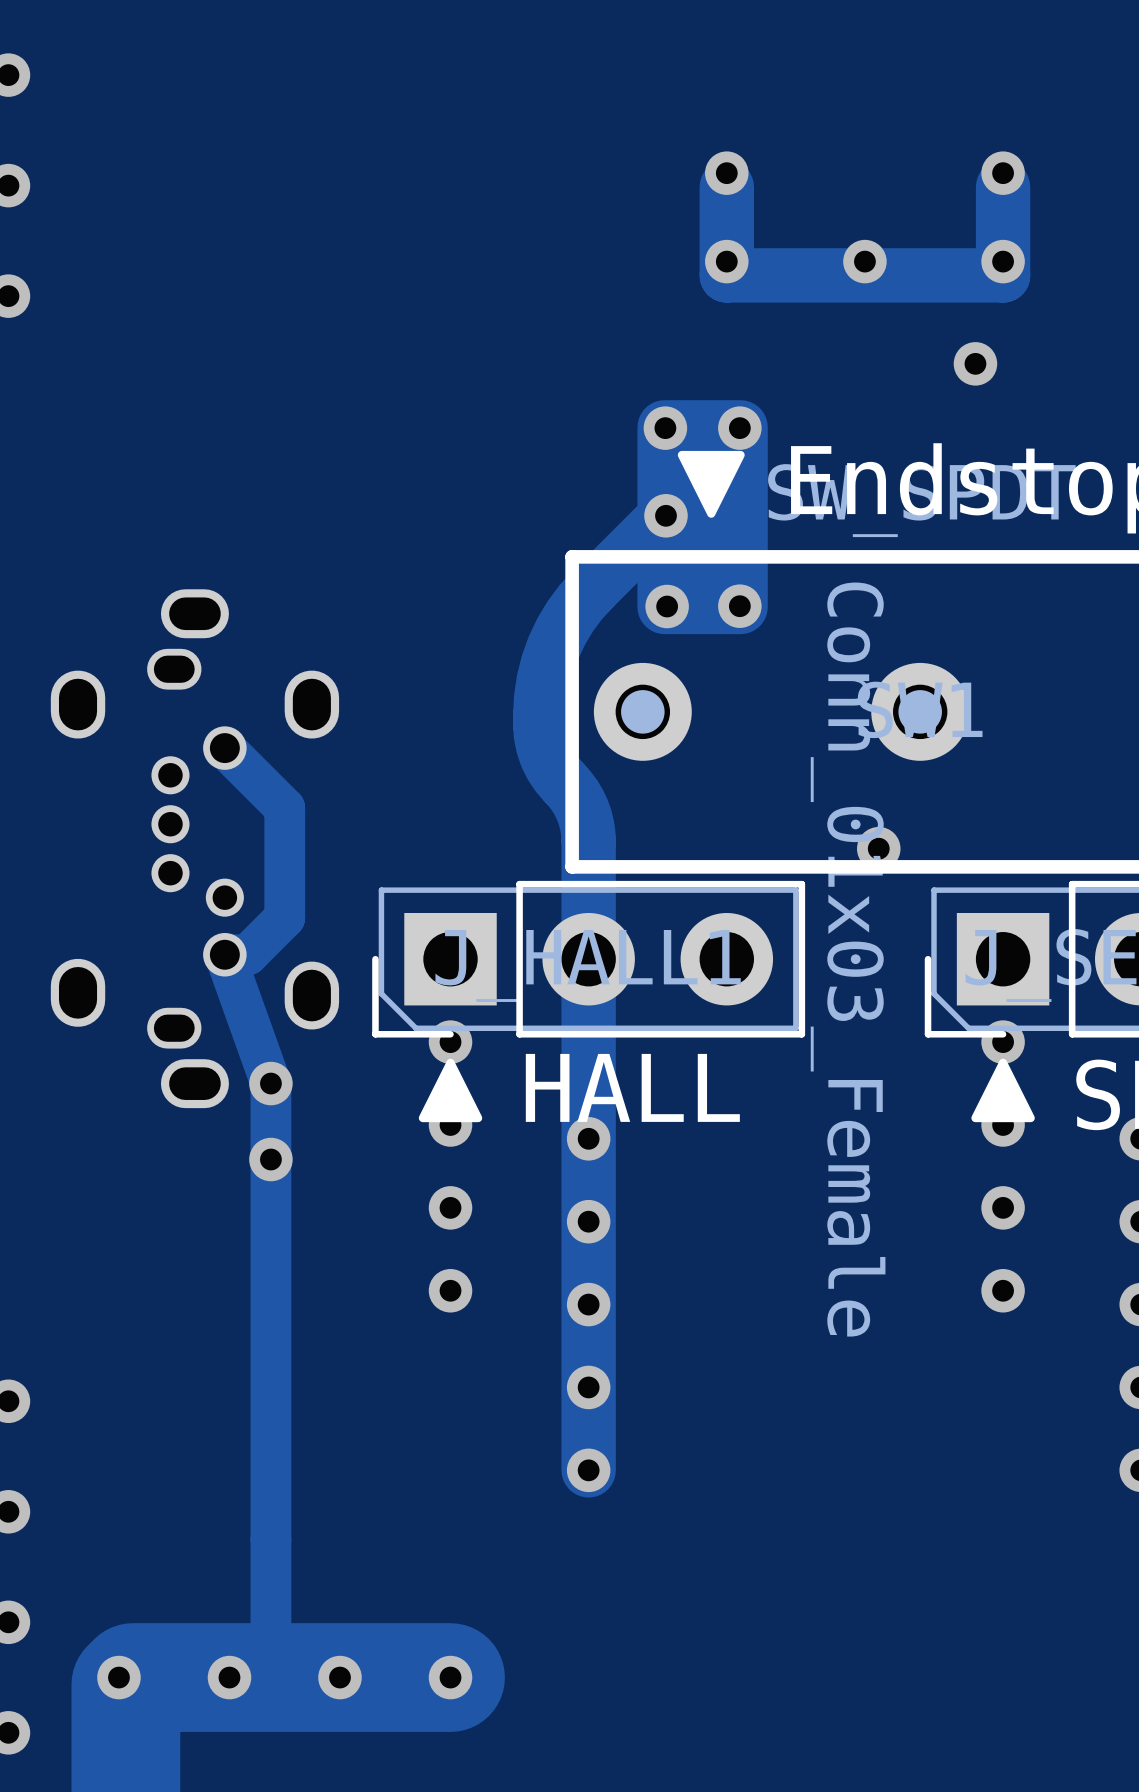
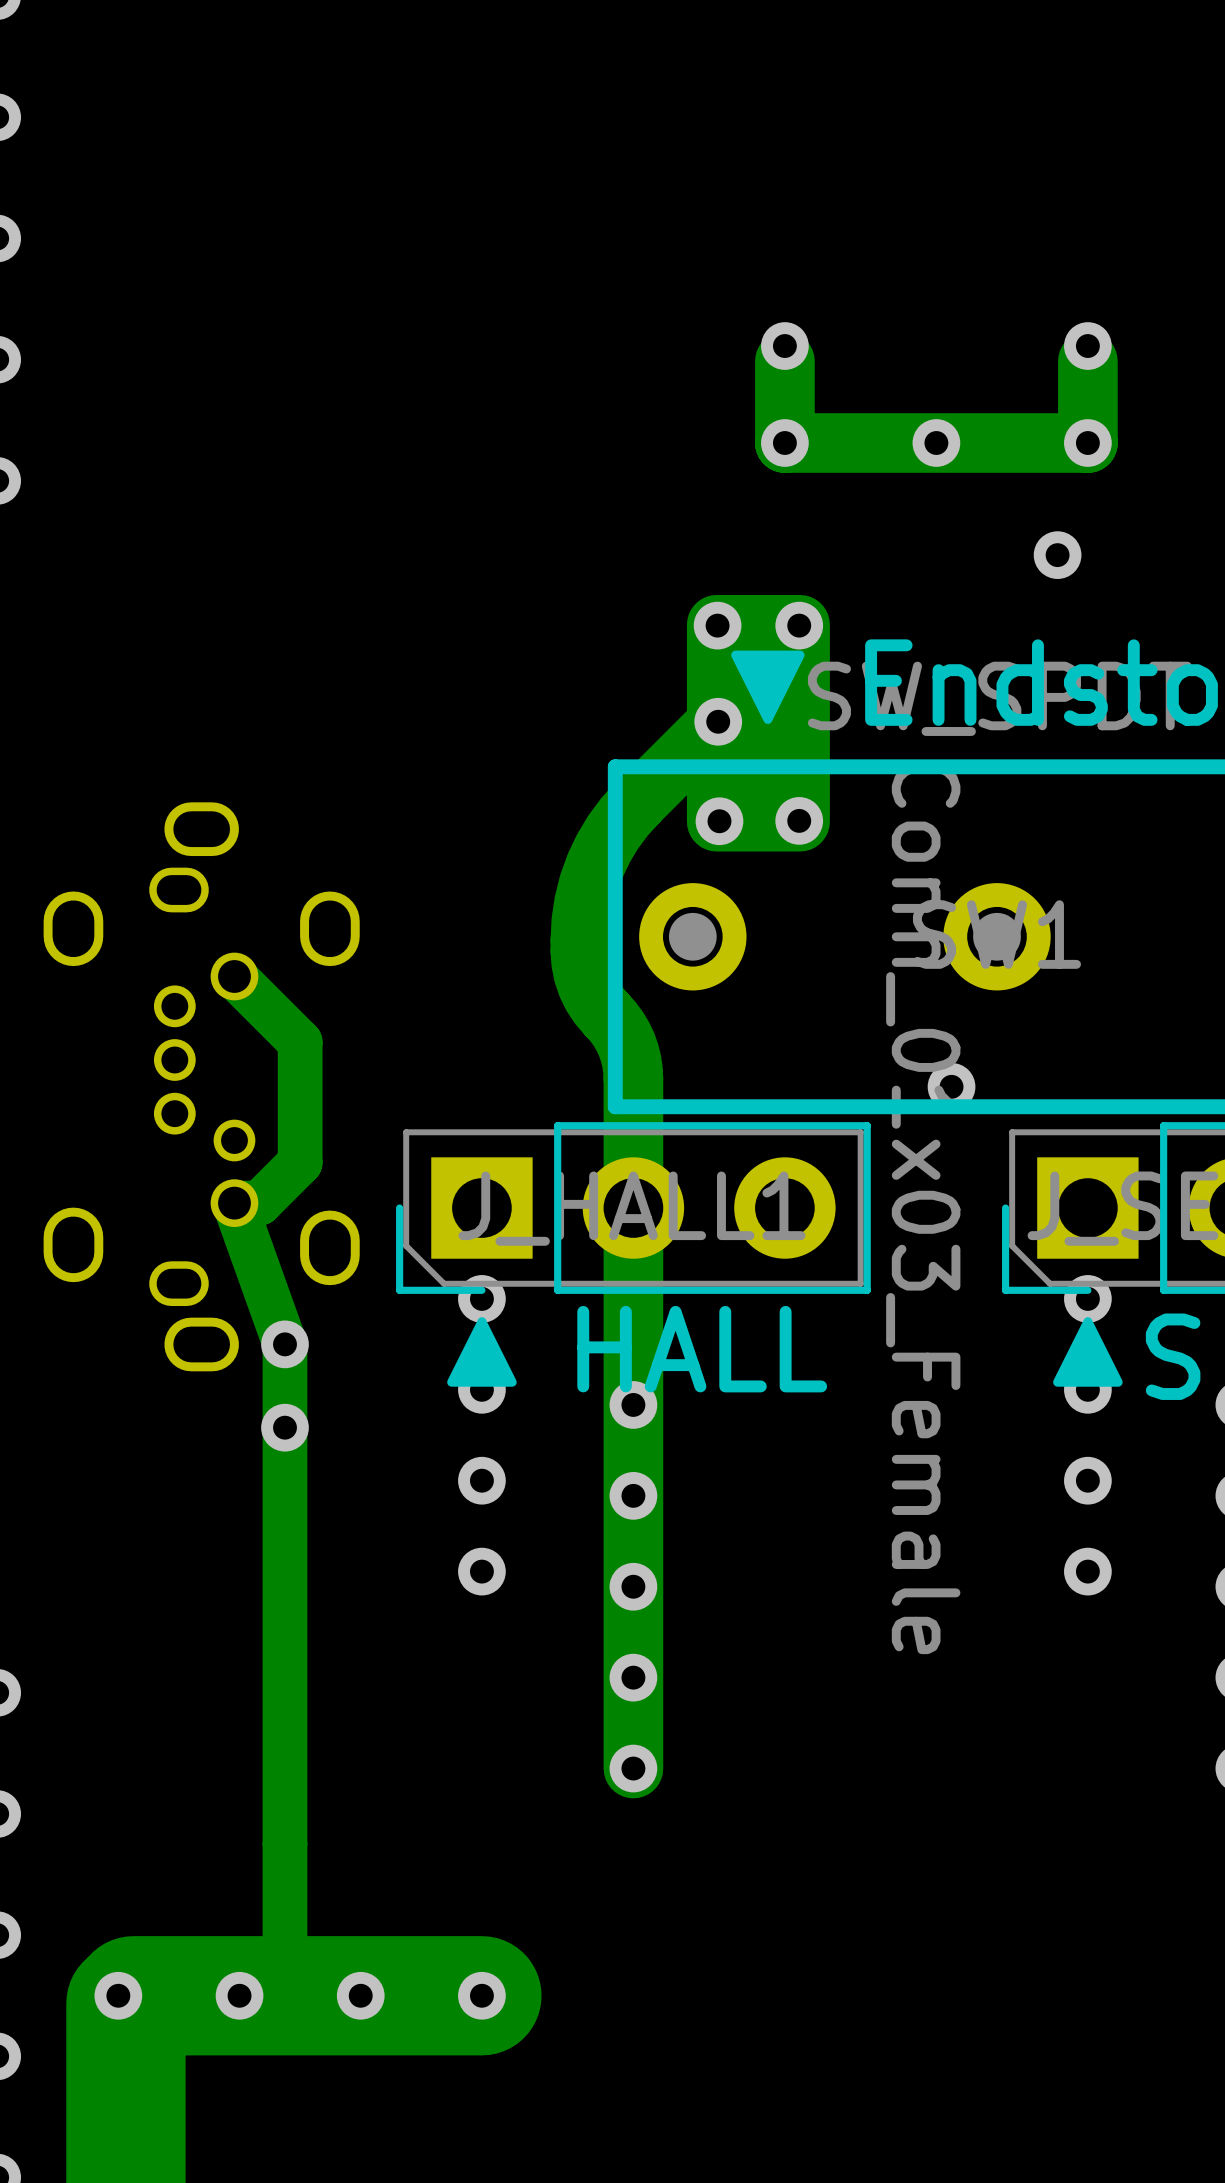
track: (1003, 261) (1003, 275) (726, 275) (726, 261) -> (1087, 443) (784, 443)

